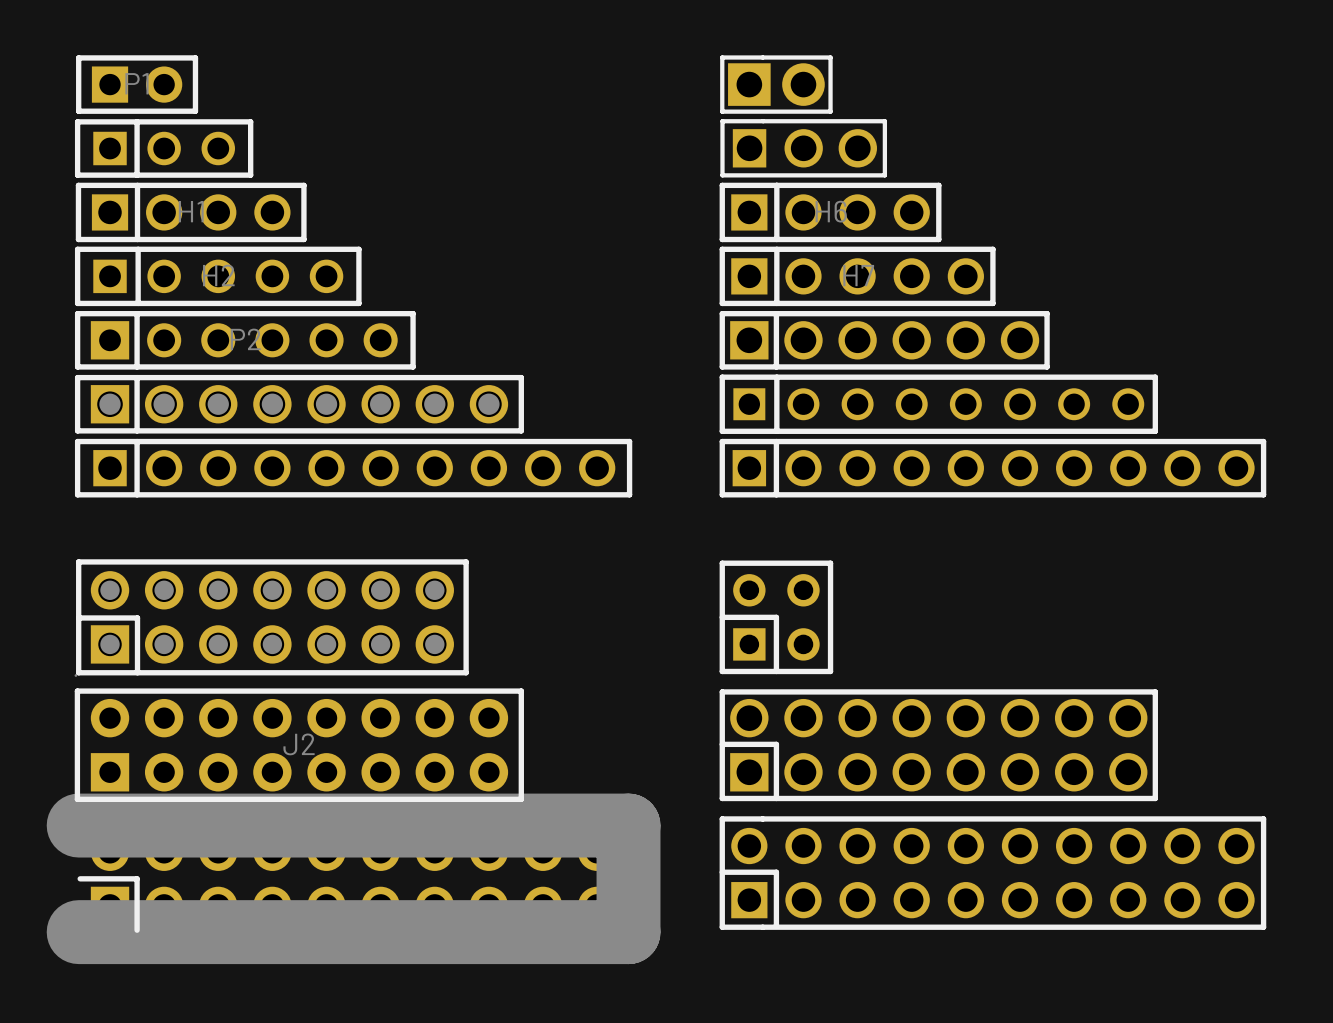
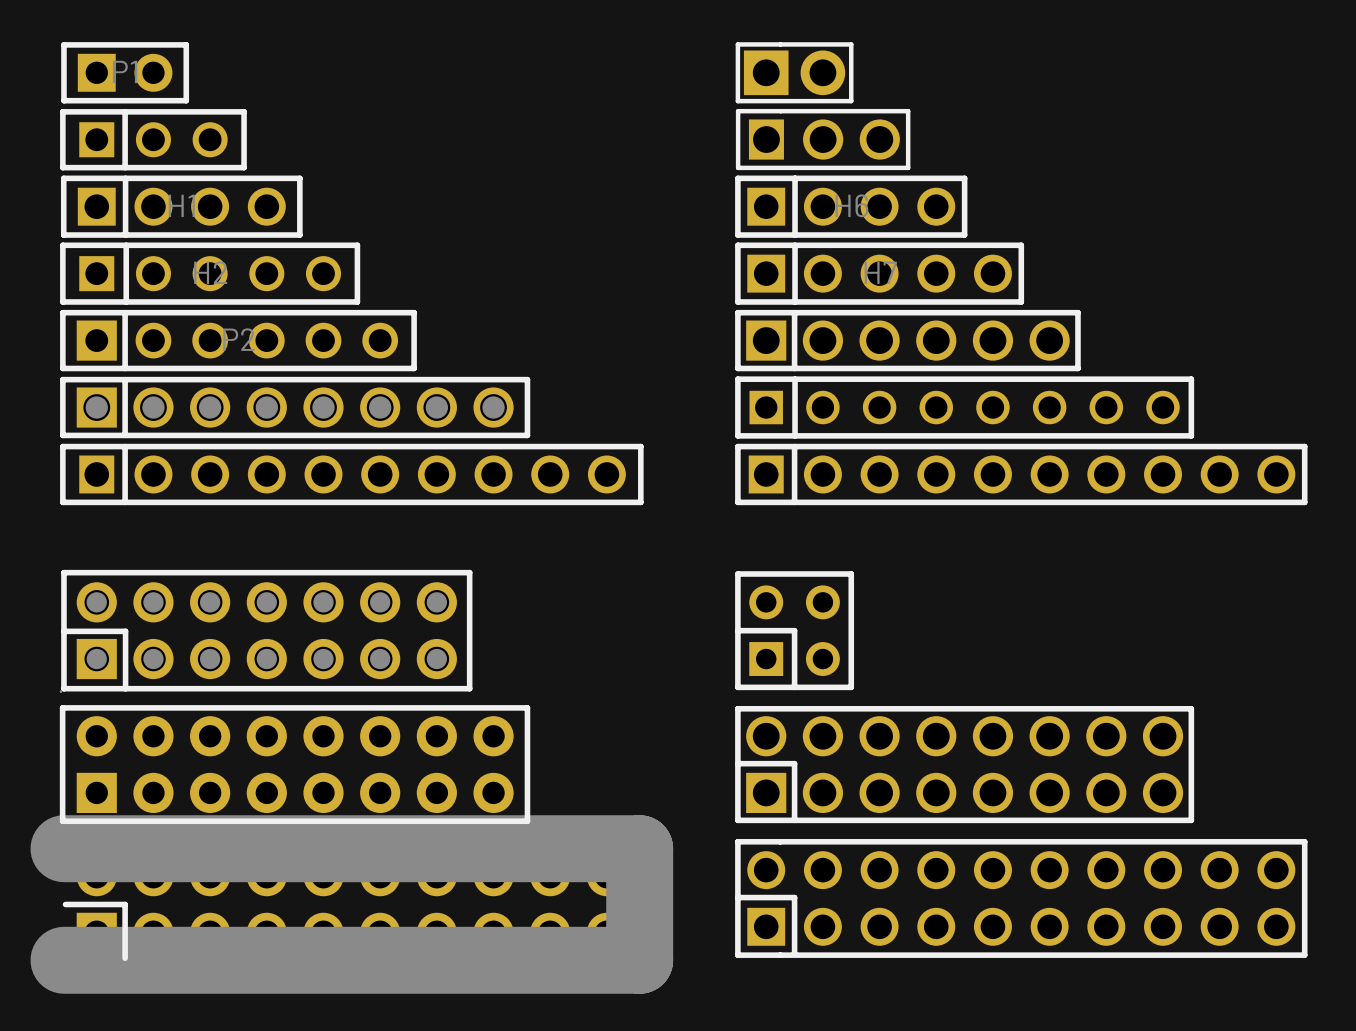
J2 name: J2 (299, 744) -> none

